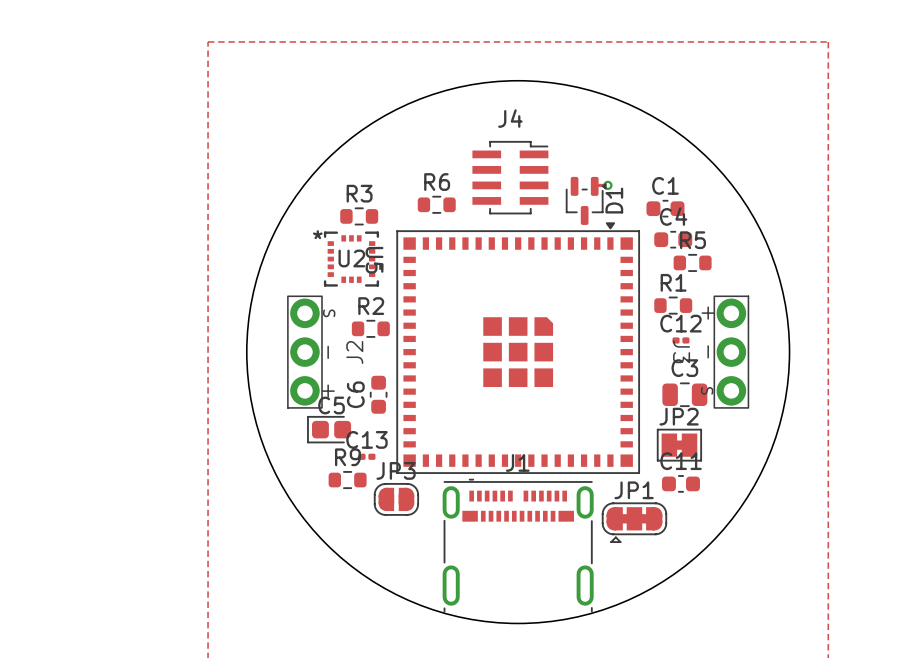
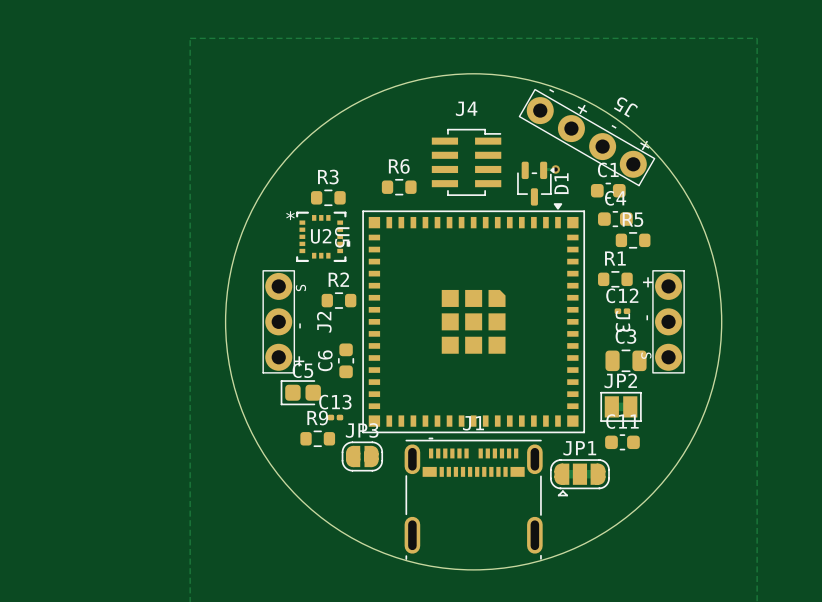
J5: none -> (587, 137)

